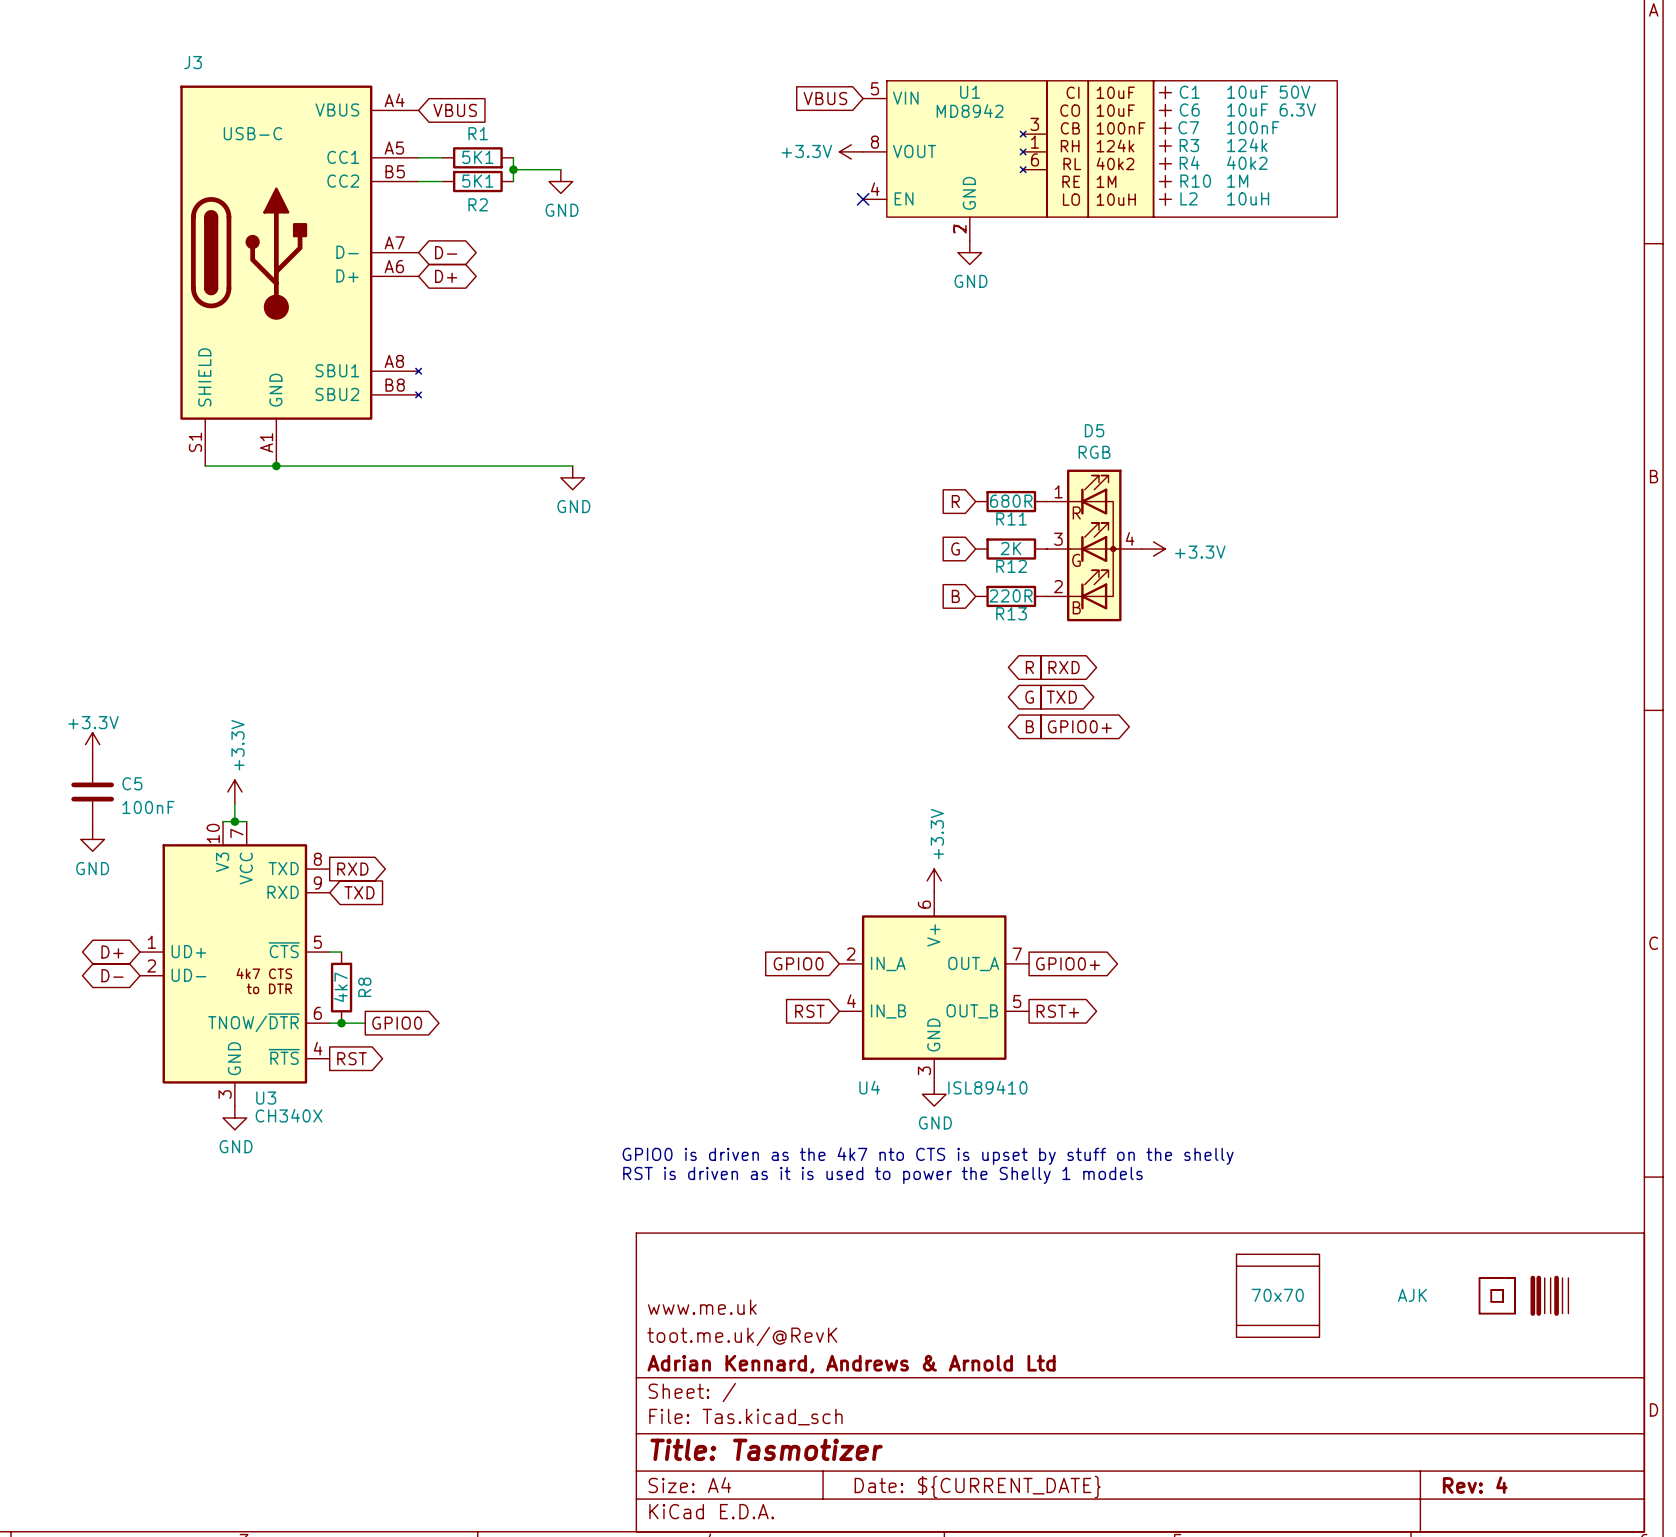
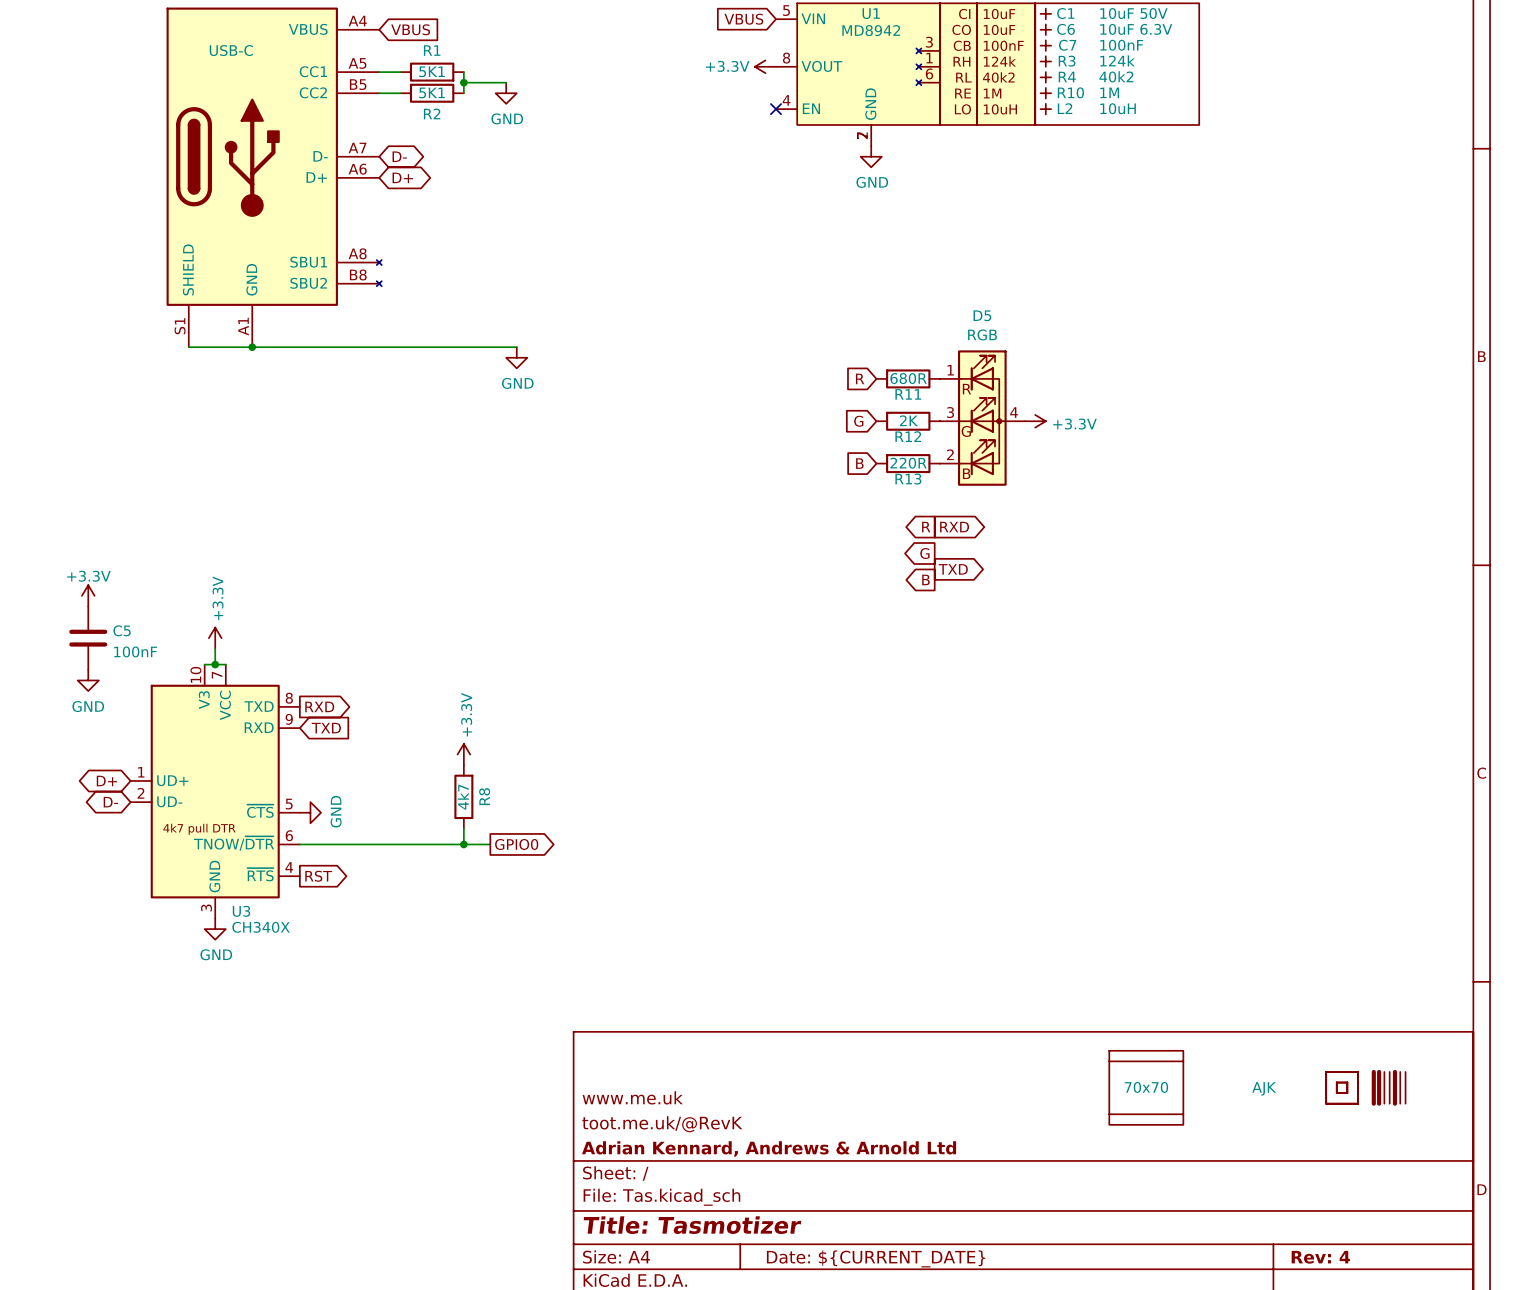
global label position: TXD (1061, 697) -> TXD (953, 569)
global label: GPIO0+ (1079, 726) -> none
U3 symbol: [140, 821, 330, 1107] -> [130, 664, 300, 919]
power symbol: +3.3V (934, 880) -> none
power symbol: none -> +3.3V (463, 754)
wire: (329, 952) (341, 952) -> none
global label: GPIO0 (798, 963) -> none
global label: GPIO0+ (1068, 963) -> none
R8 position: (341, 987) -> (463, 796)
power symbol: none -> GND (310, 812)
U4: ISL89410 (934, 987) -> none
wire: none -> (463, 828) (463, 844)
global label: RST (809, 1011) -> none
global label: RST+ (1057, 1011) -> none
junction: (341, 1023) -> none
wire: none -> (331, 844) (490, 844)
global label: GPIO0 (397, 1023) -> none
junction: none -> (463, 844)
global label: none -> GPIO0 (516, 844)
power symbol: GND (934, 1094) -> none
text: GPIO0 is driven as the 4k7 nto CTS is upset by stuff on the shelly (928, 1156) -> none
text: RST is driven as it is used to power the Shelly 1 models (882, 1175) -> none

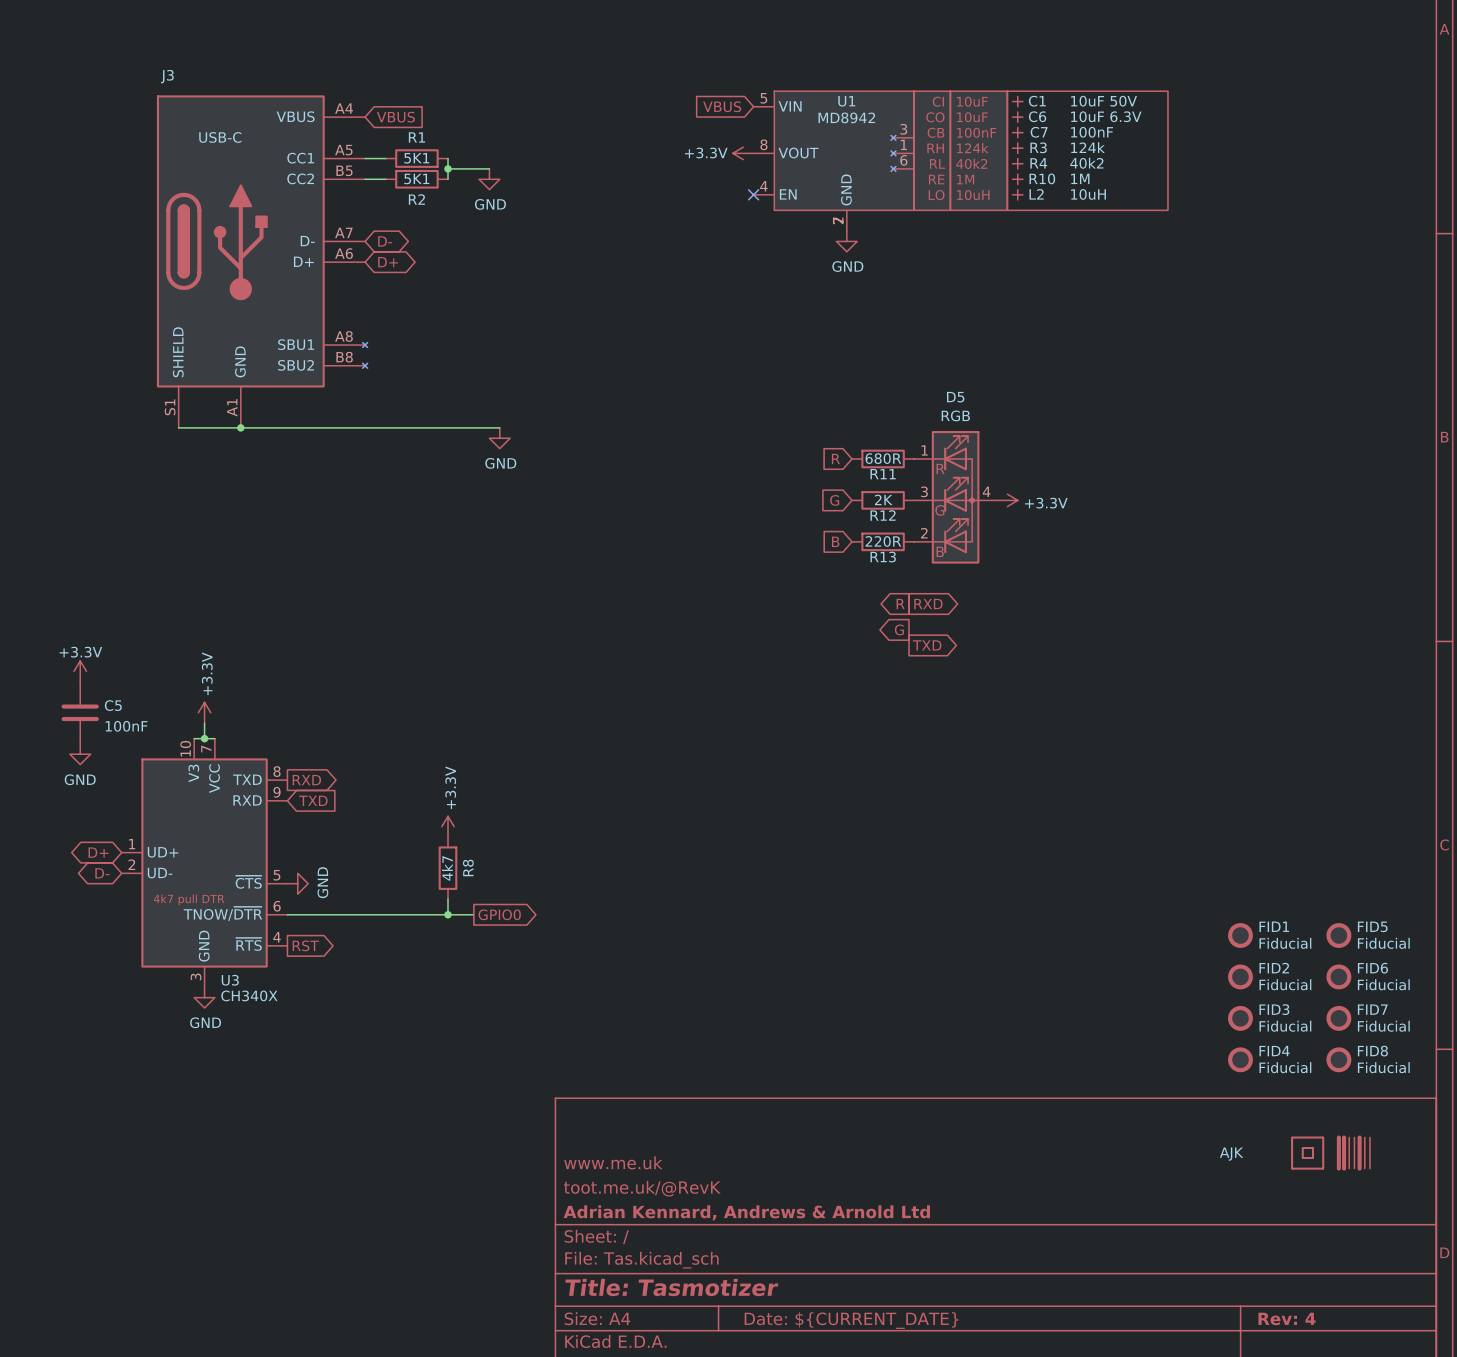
global label: B (925, 579) -> none
FID1: none -> Fiducial (1240, 935)
FID5: none -> Fiducial (1338, 935)
FID2: none -> Fiducial (1240, 976)
FID6: none -> Fiducial (1338, 976)
FID3: none -> Fiducial (1240, 1018)
FID7: none -> Fiducial (1338, 1018)
FID4: none -> Fiducial (1240, 1059)
FID8: none -> Fiducial (1338, 1059)
part: 70x70 (1146, 1087) -> none

